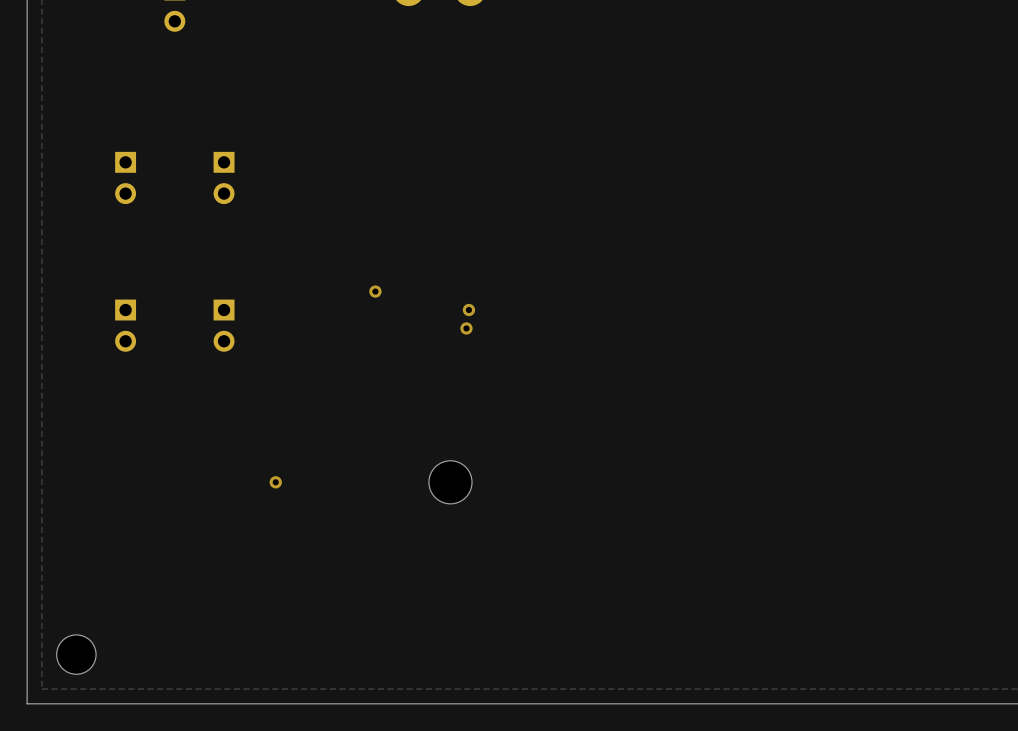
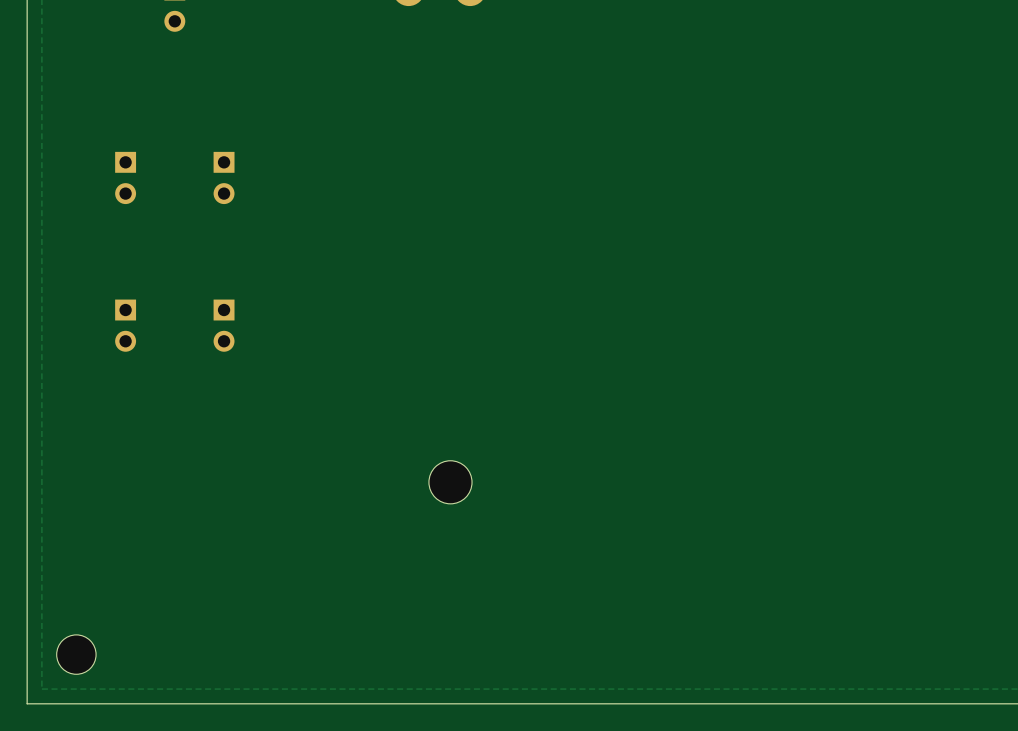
via: (375, 291) -> none
via: (468, 310) -> none
via: (466, 328) -> none
via: (275, 482) -> none

